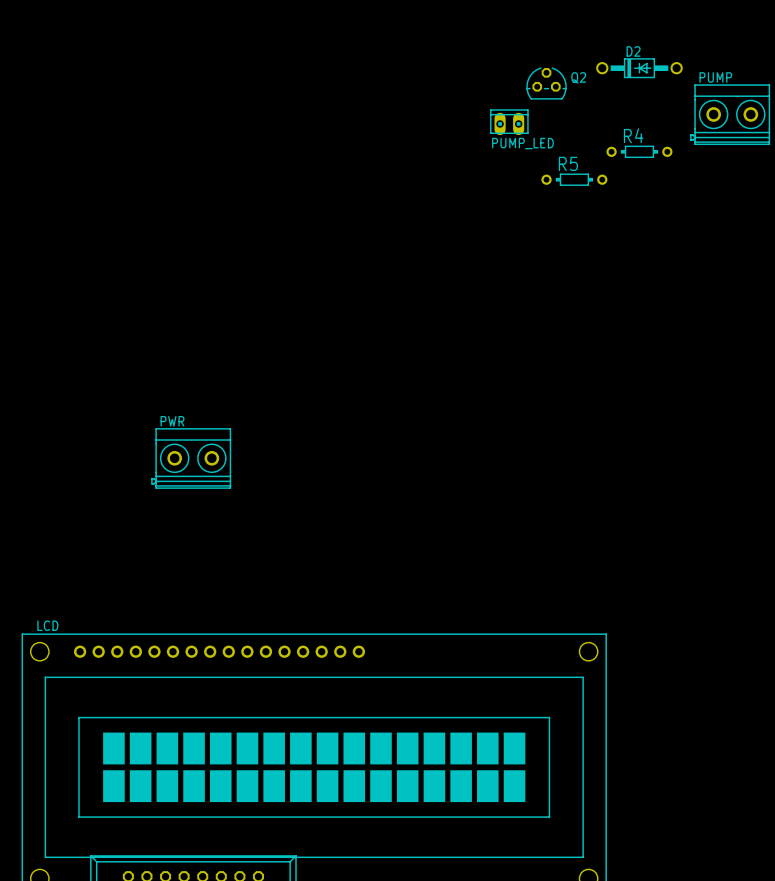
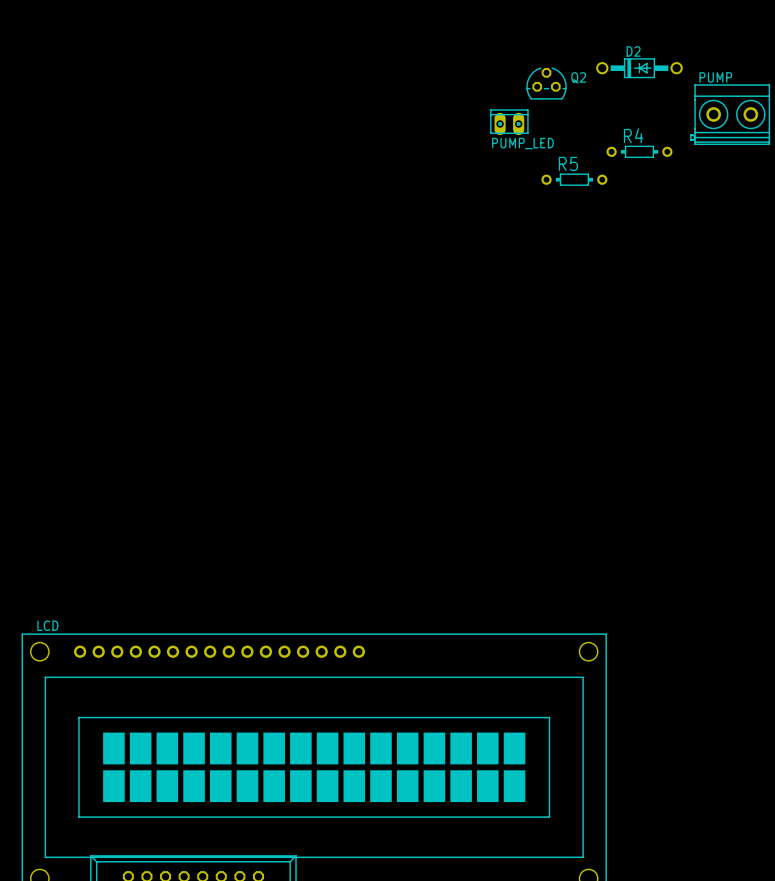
PWR: (191, 458) -> none

